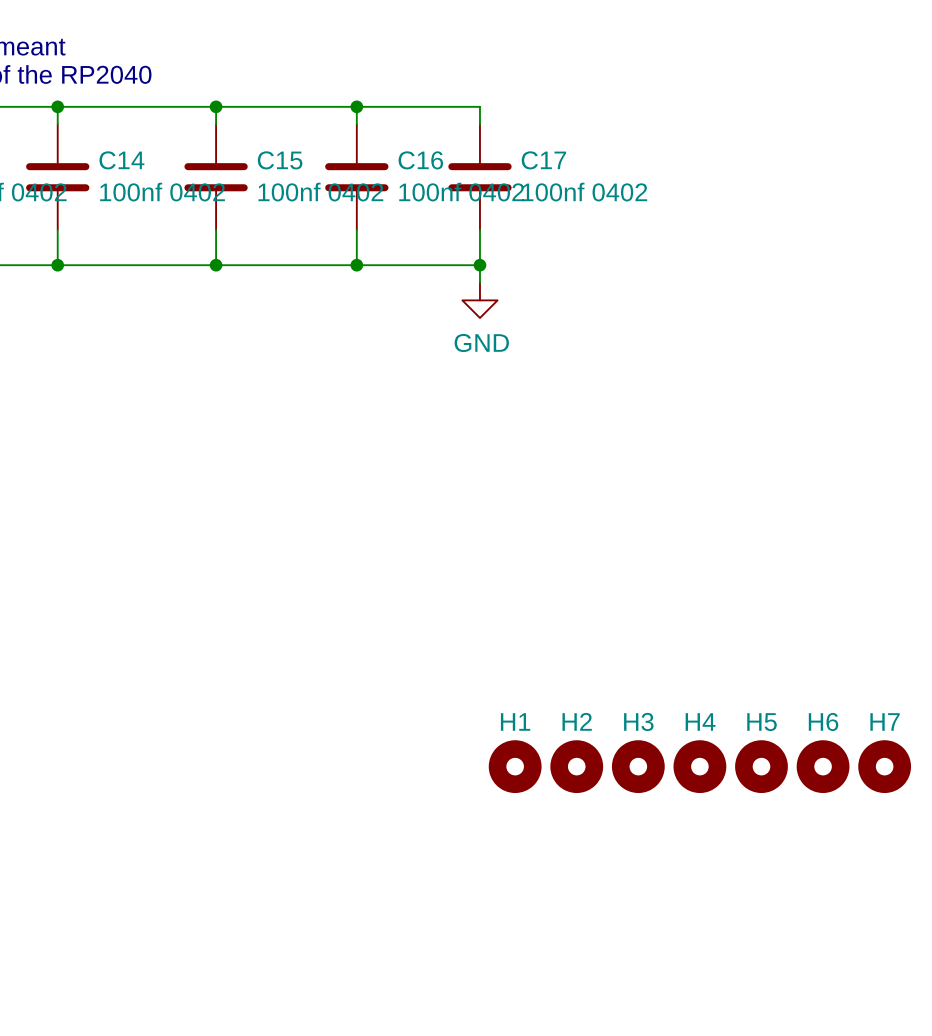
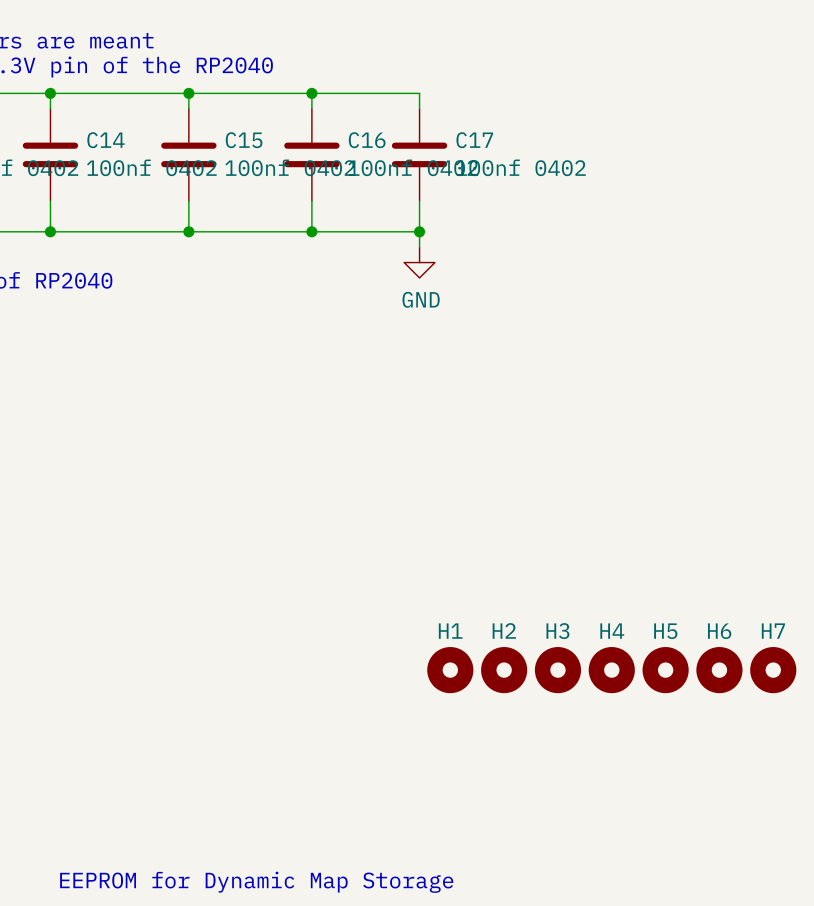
text: none -> EEPROM for Dynamic Map Storage (256, 882)

